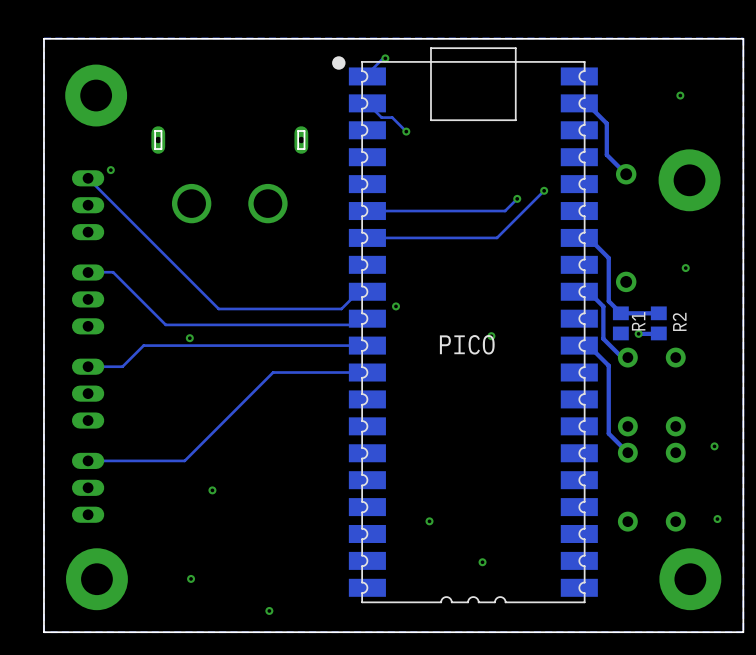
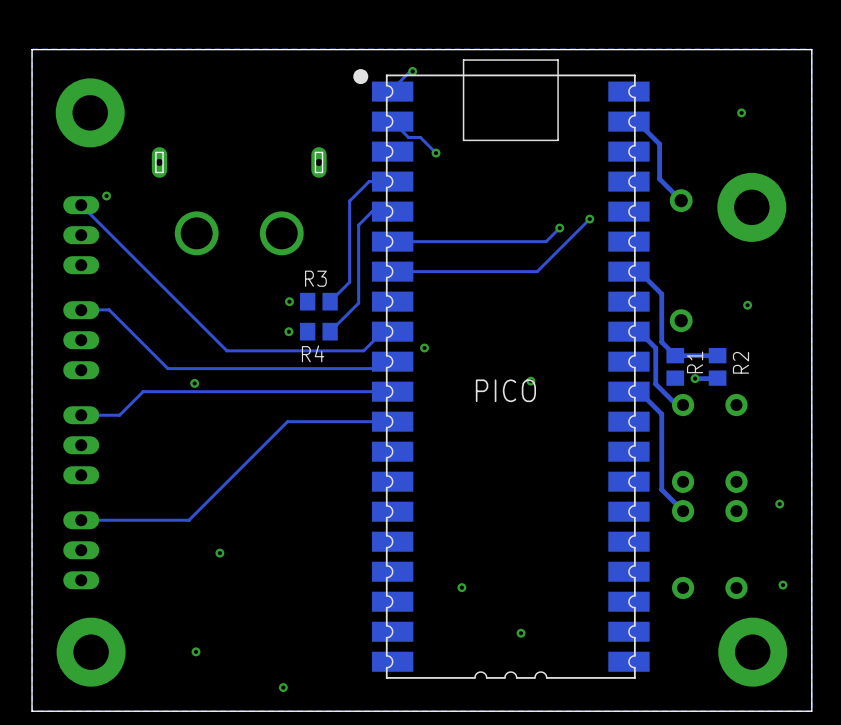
track: none -> (392, 181) (369, 181) (349, 201) (349, 282) (330, 301)
track: none -> (392, 211) (372, 211) (358, 225) (358, 303) (330, 331)
via: none -> (289, 301)
R3: none -> (318, 301)
via: none -> (288, 331)
R4: none -> (318, 331)

